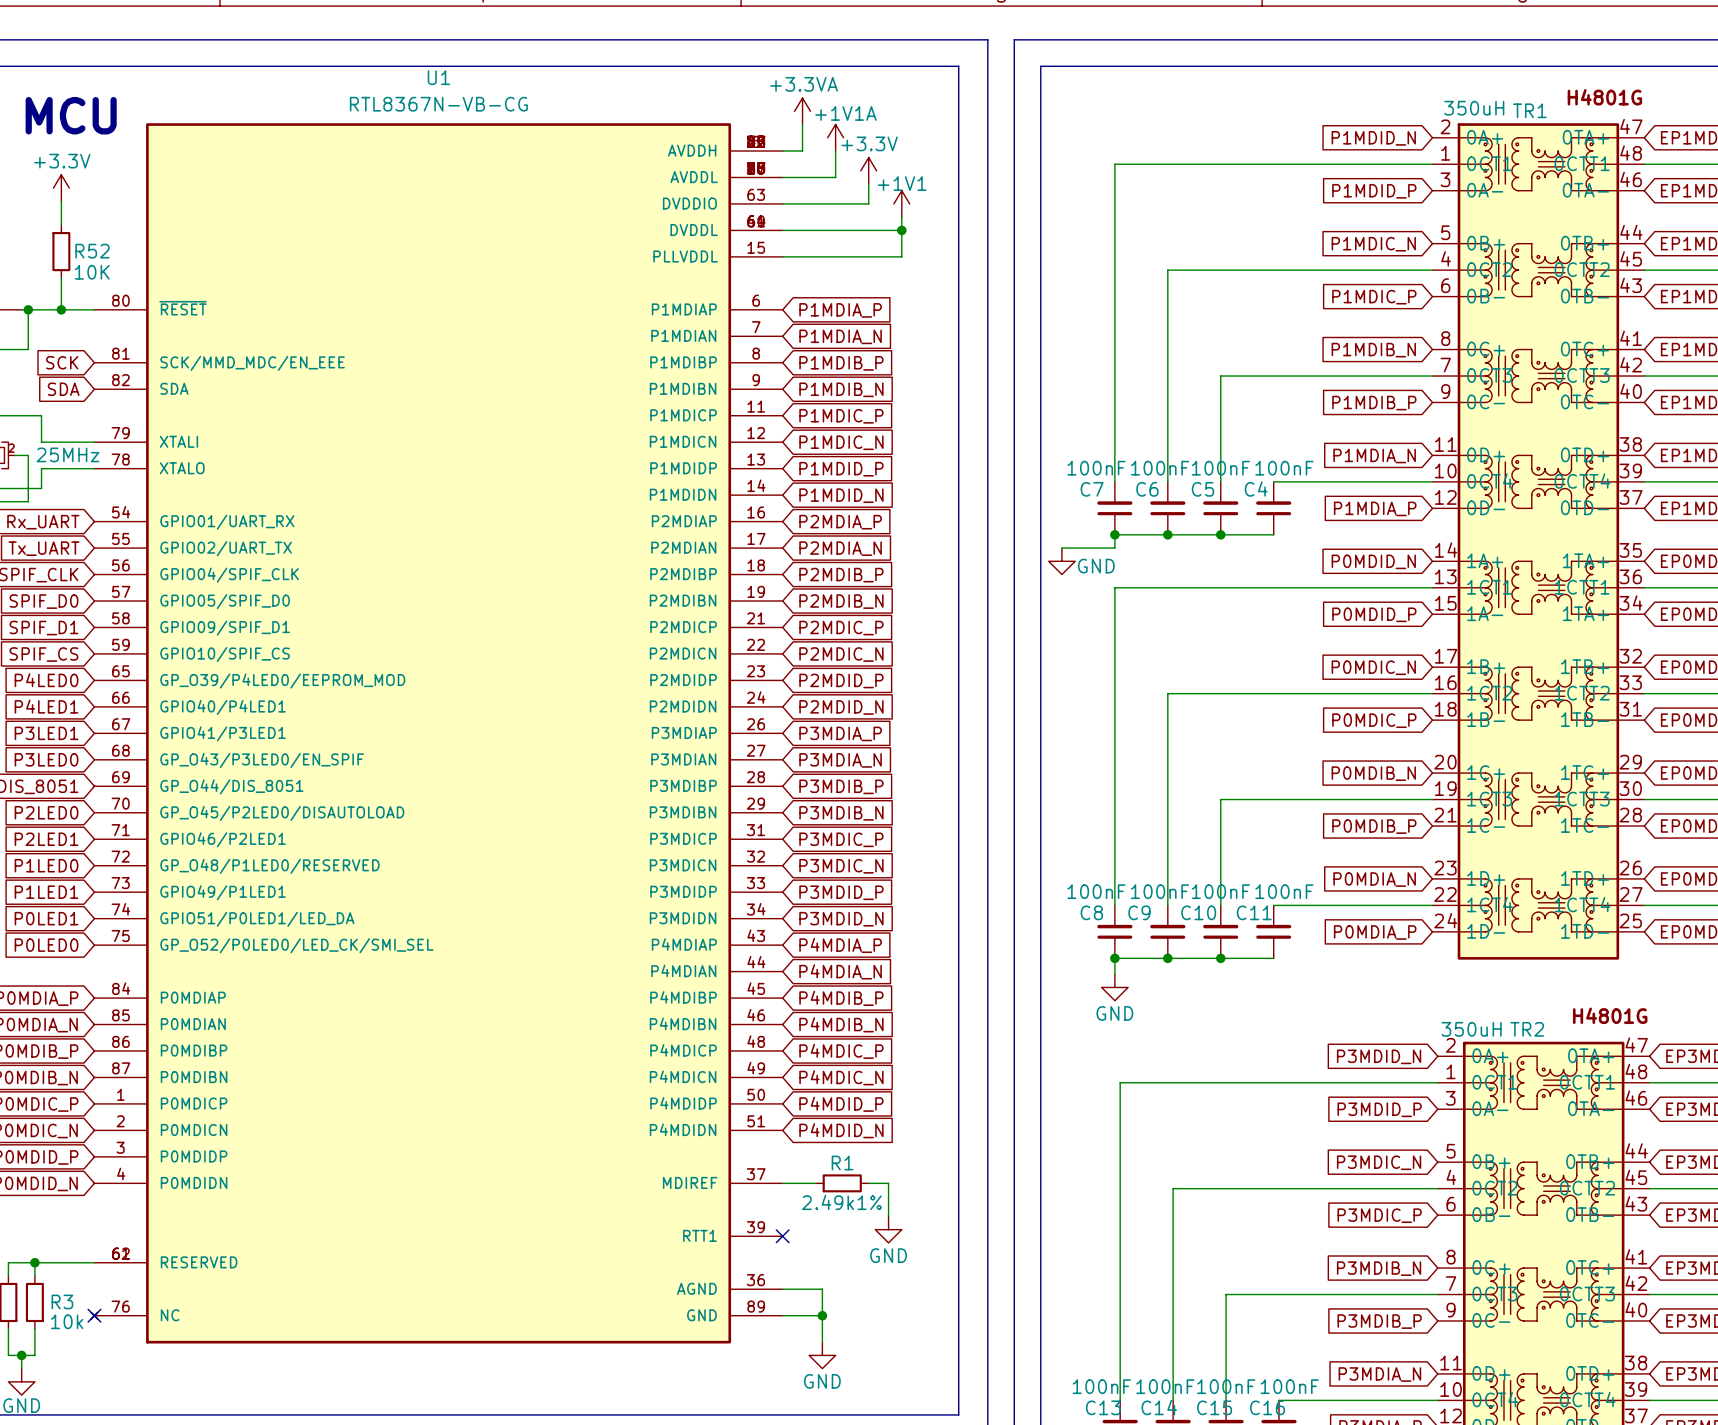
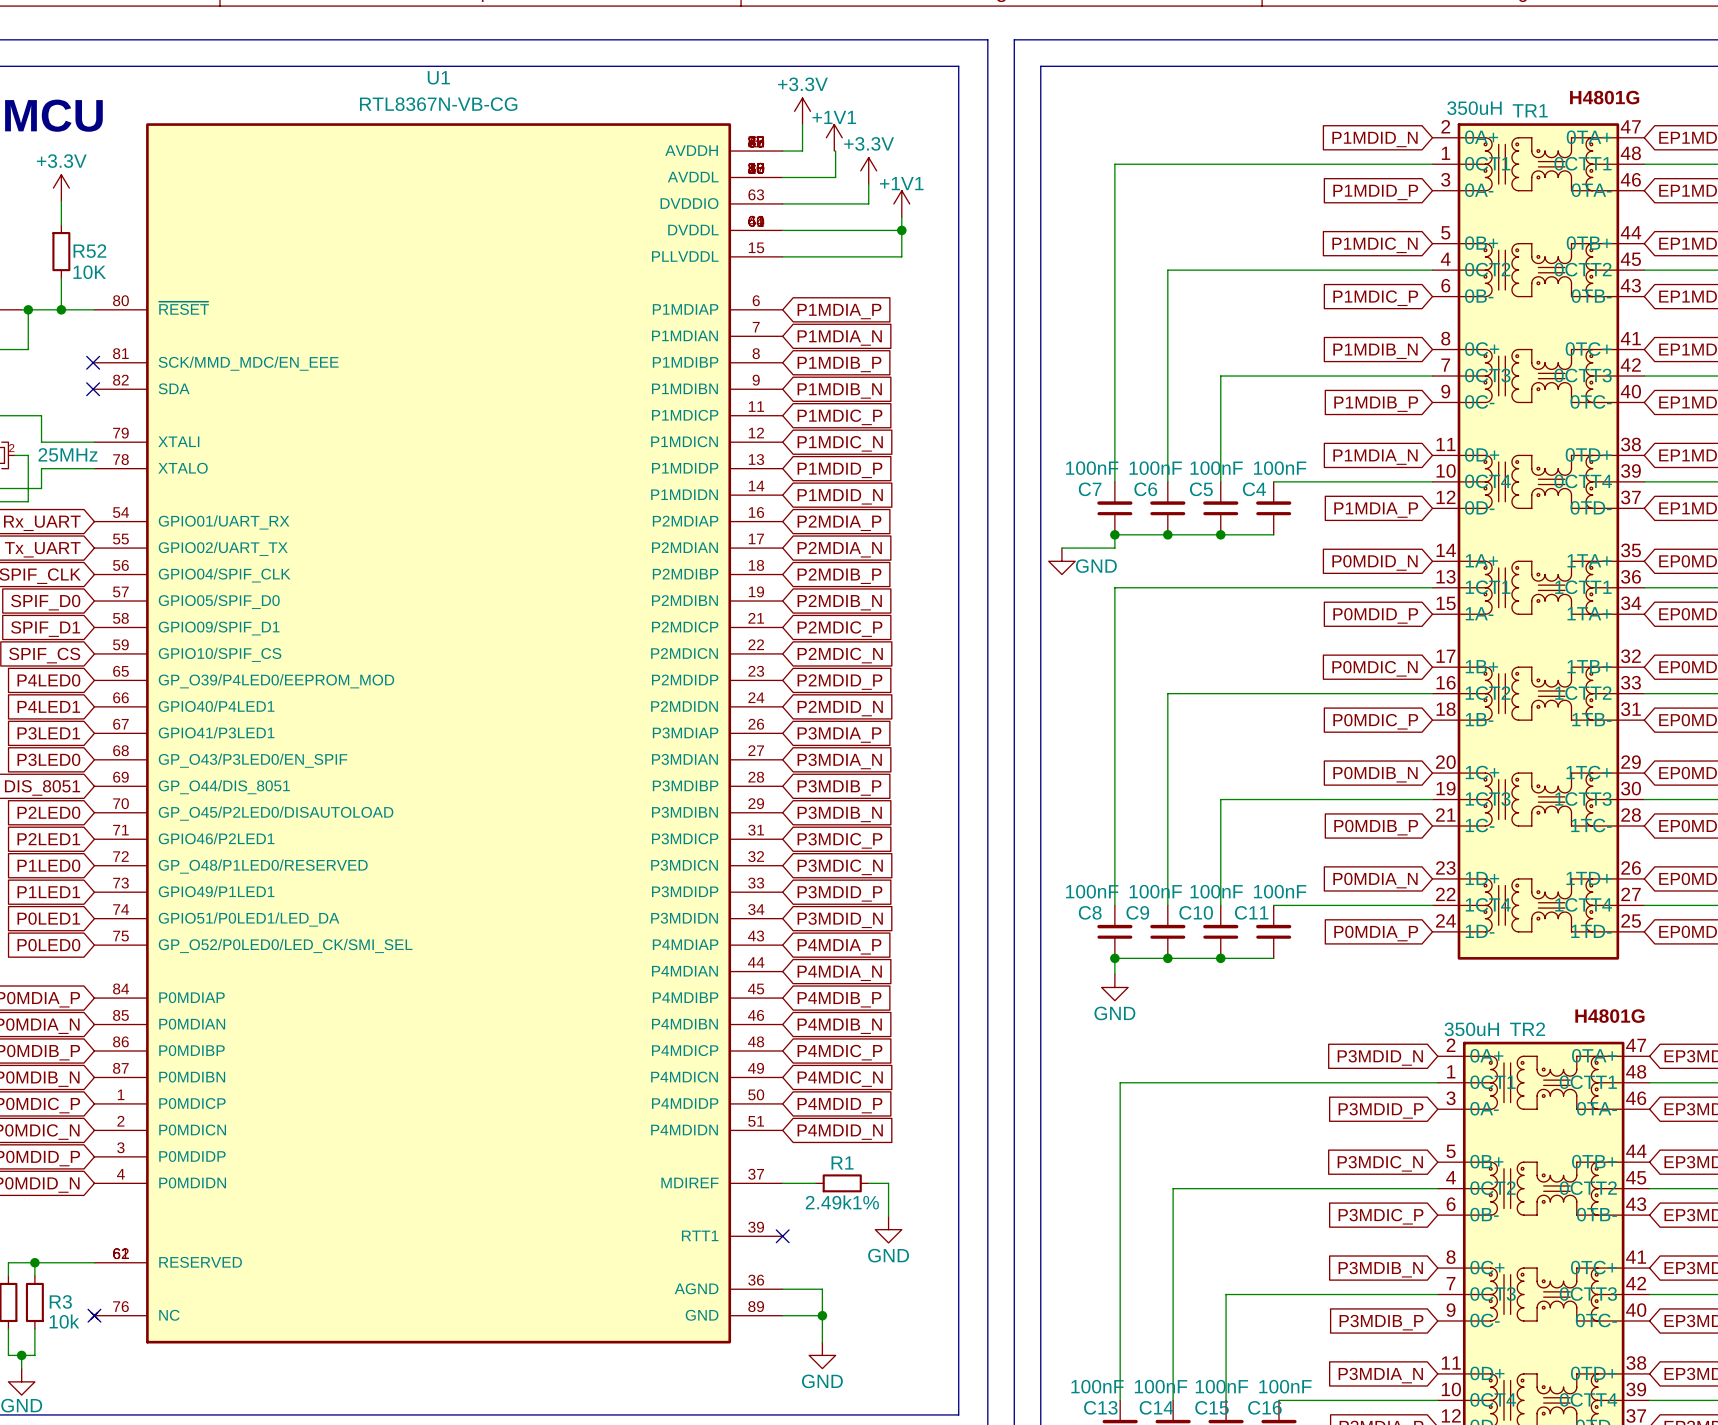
power symbol: +3.3VA (802, 111) -> +3.3V (802, 111)
power symbol: +1V1A (835, 137) -> +1V1 (834, 137)
global label: SCK (62, 362) -> none
no-connect mark: none -> (93, 362)
global label: SDA (63, 389) -> none
no-connect mark: none -> (93, 389)

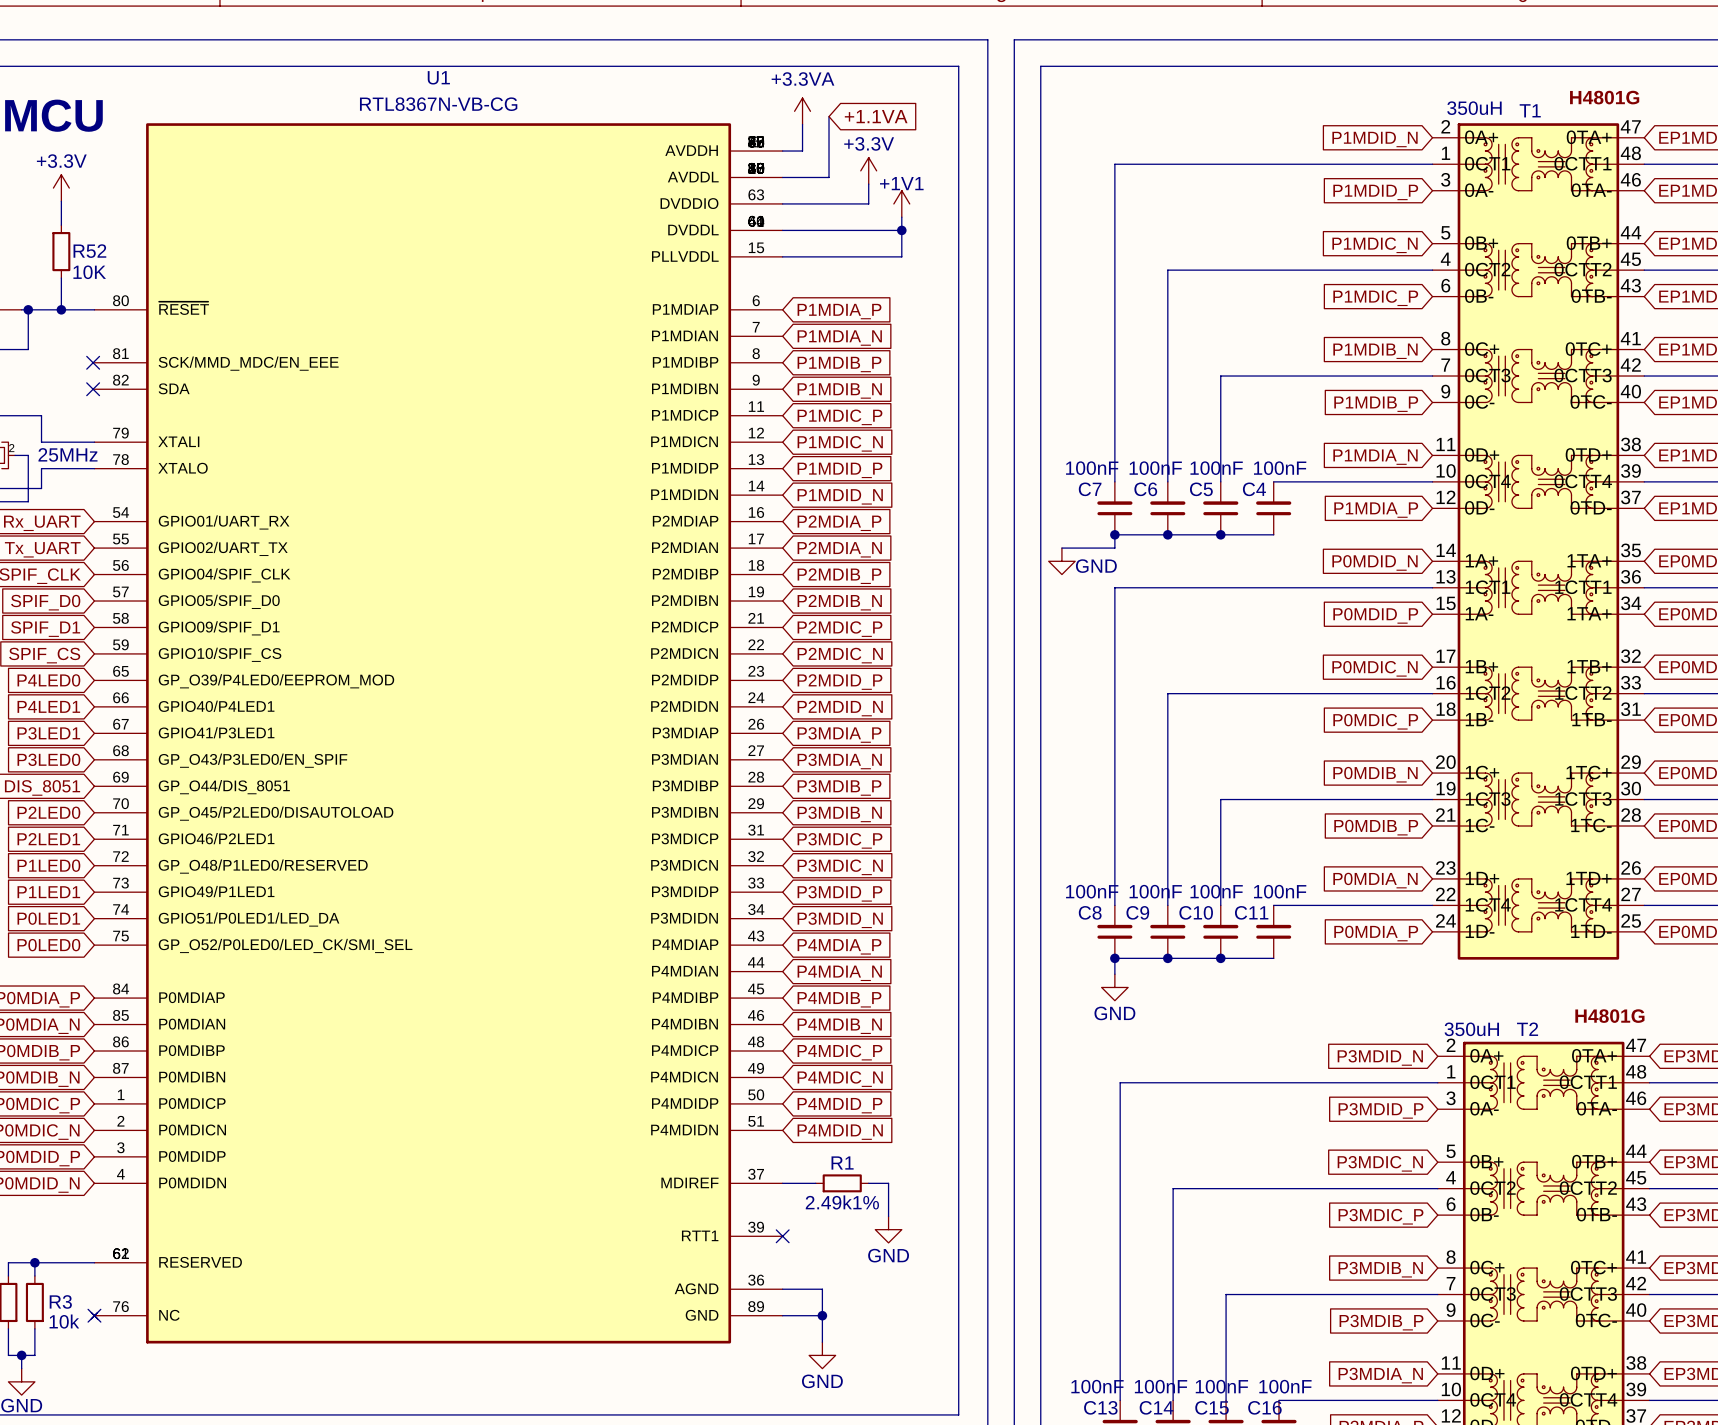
TR1 name: TR1 (1530, 110) -> T1 (1530, 110)
power symbol: +3.3V (802, 111) -> +3.3VA (802, 111)
global label: none -> +1.1VA (876, 116)
power symbol: +1V1 (834, 137) -> none
wire: (835, 151) (835, 177) (829, 177) -> (829, 116) (829, 177)
TR2 name: TR2 (1527, 1029) -> T2 (1527, 1029)

